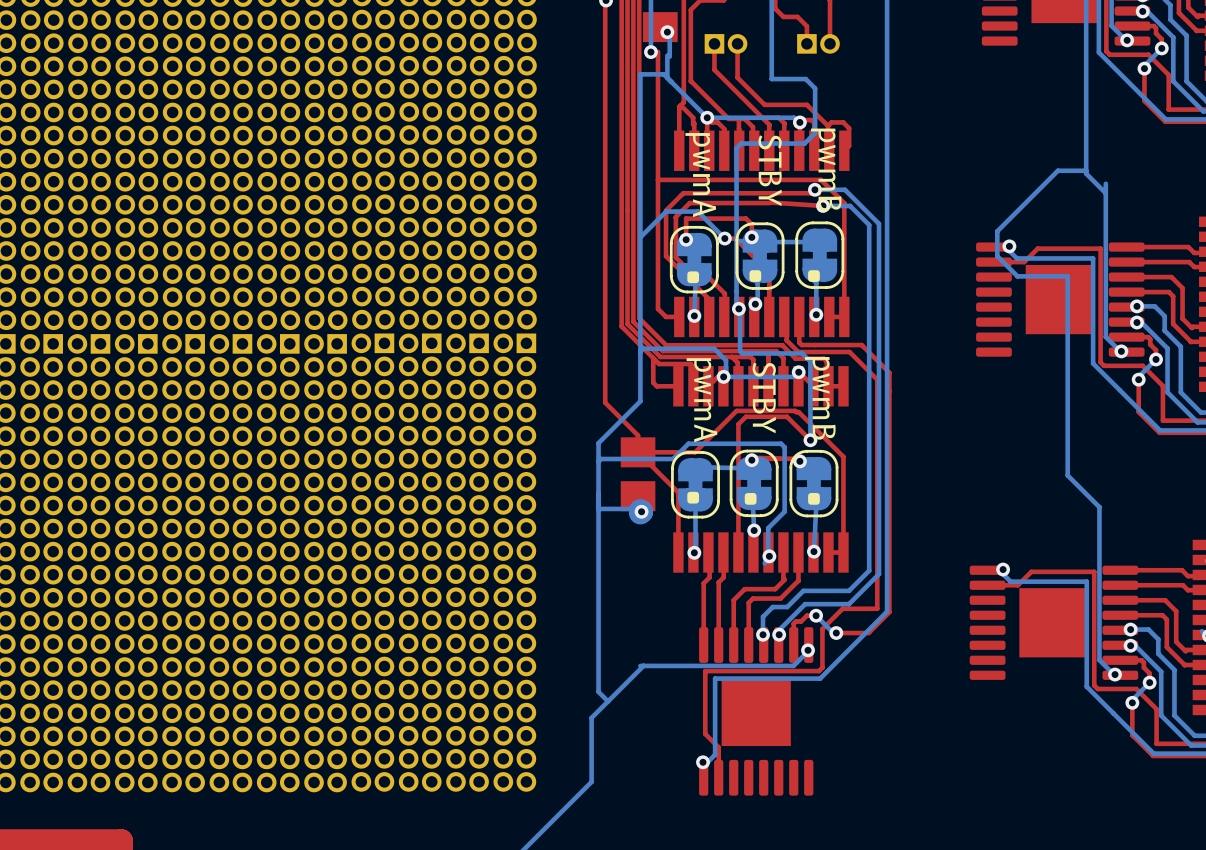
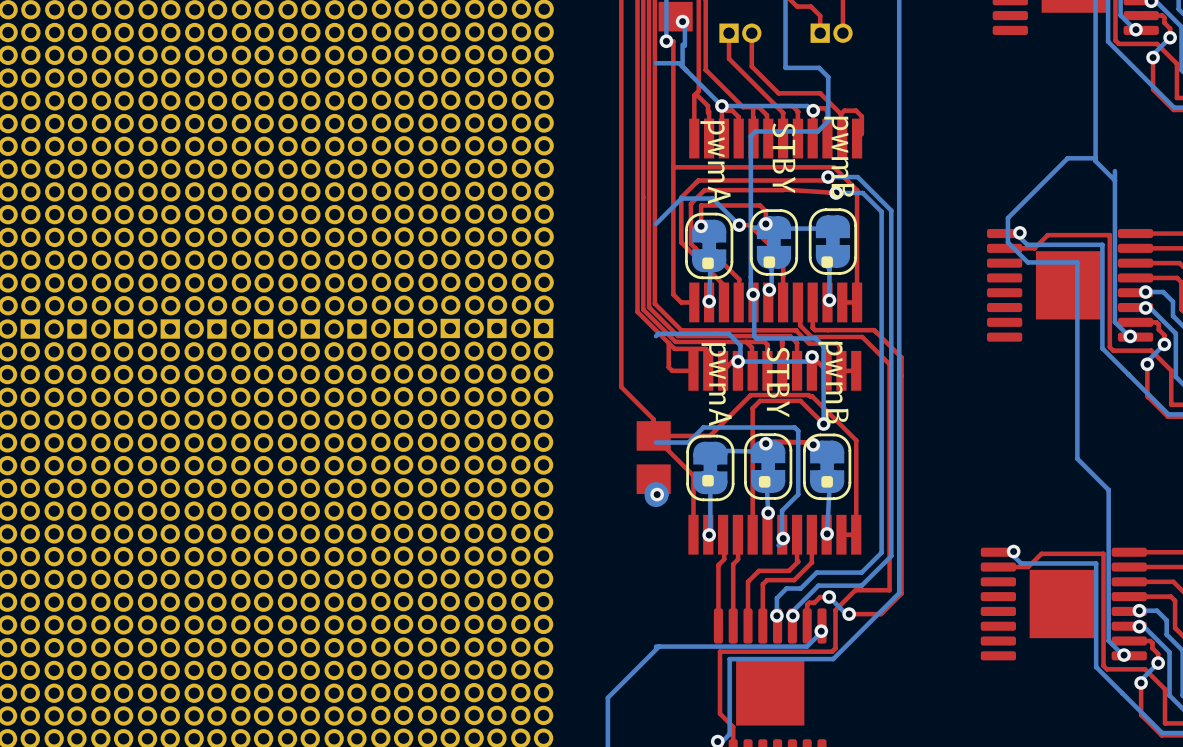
bottom track: (640, 74) (640, 401) (598, 443) (598, 691) (608, 701) -> none
bottom track: (640, 459) (601, 459) (598, 461) -> none
bottom track: (598, 508) (636, 508) (640, 512) -> none

